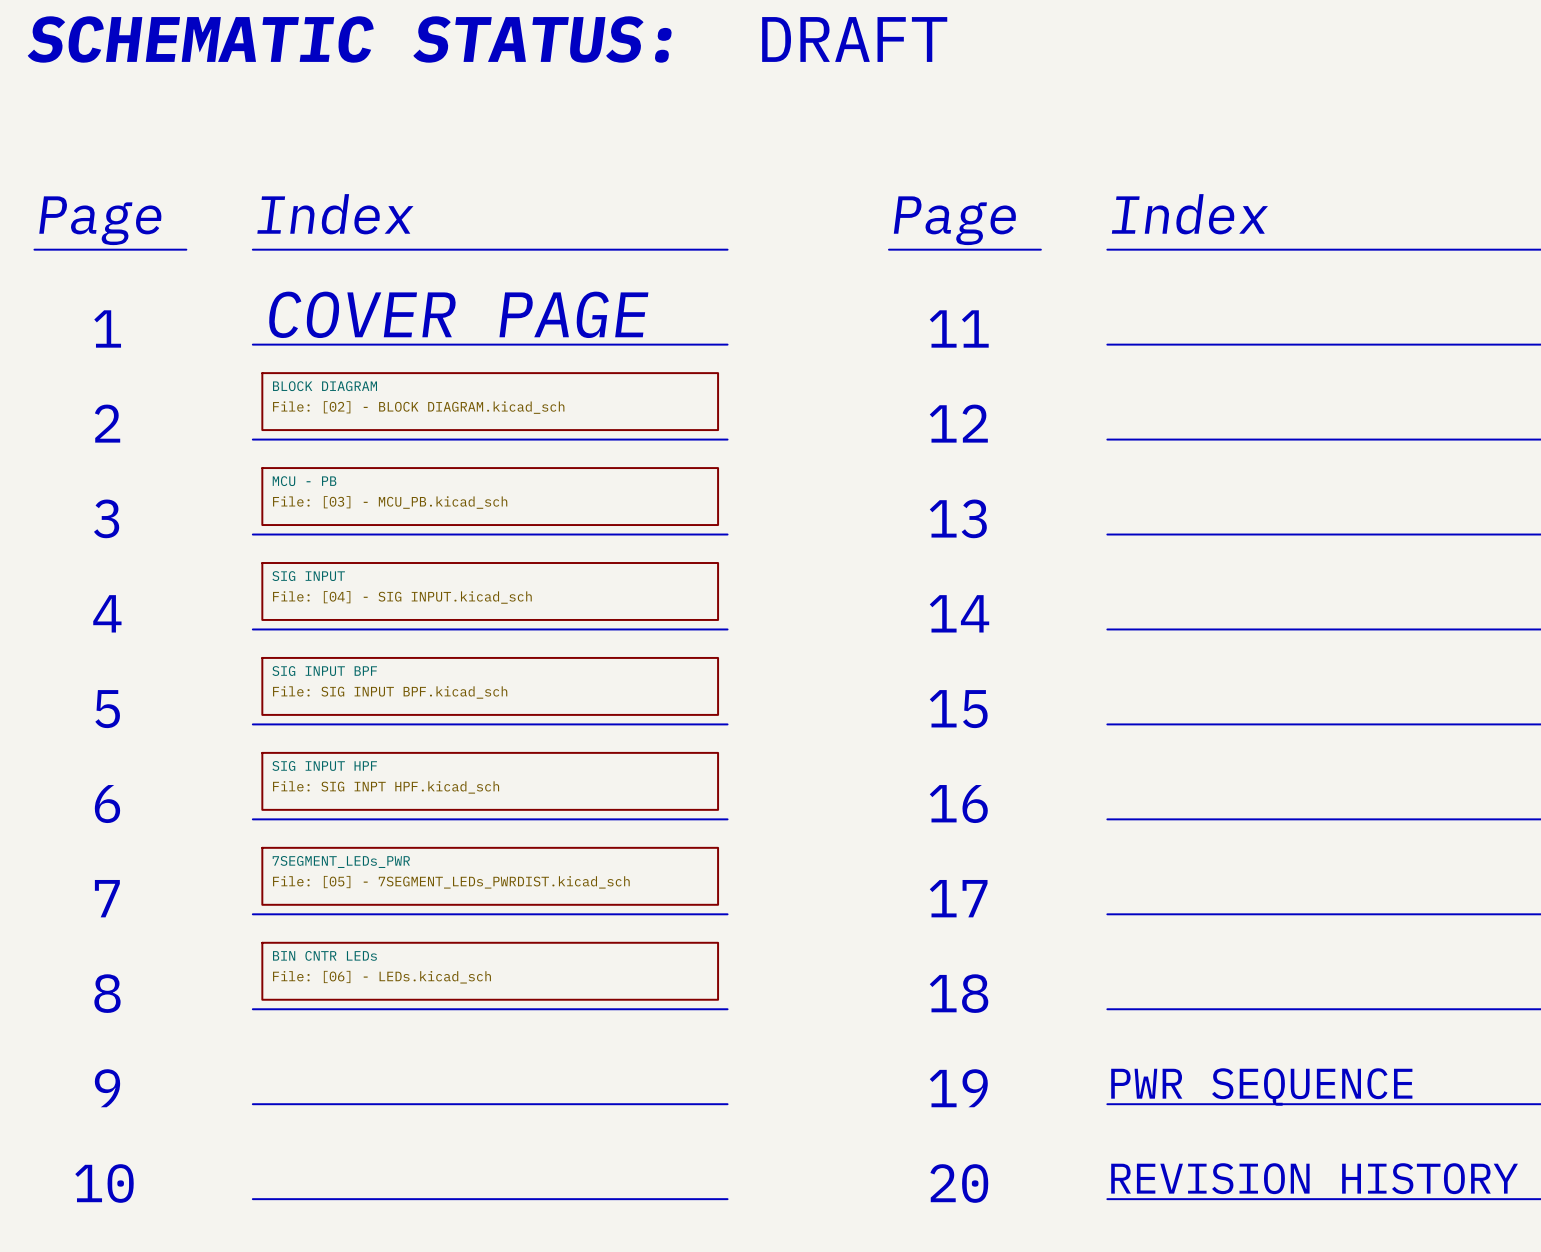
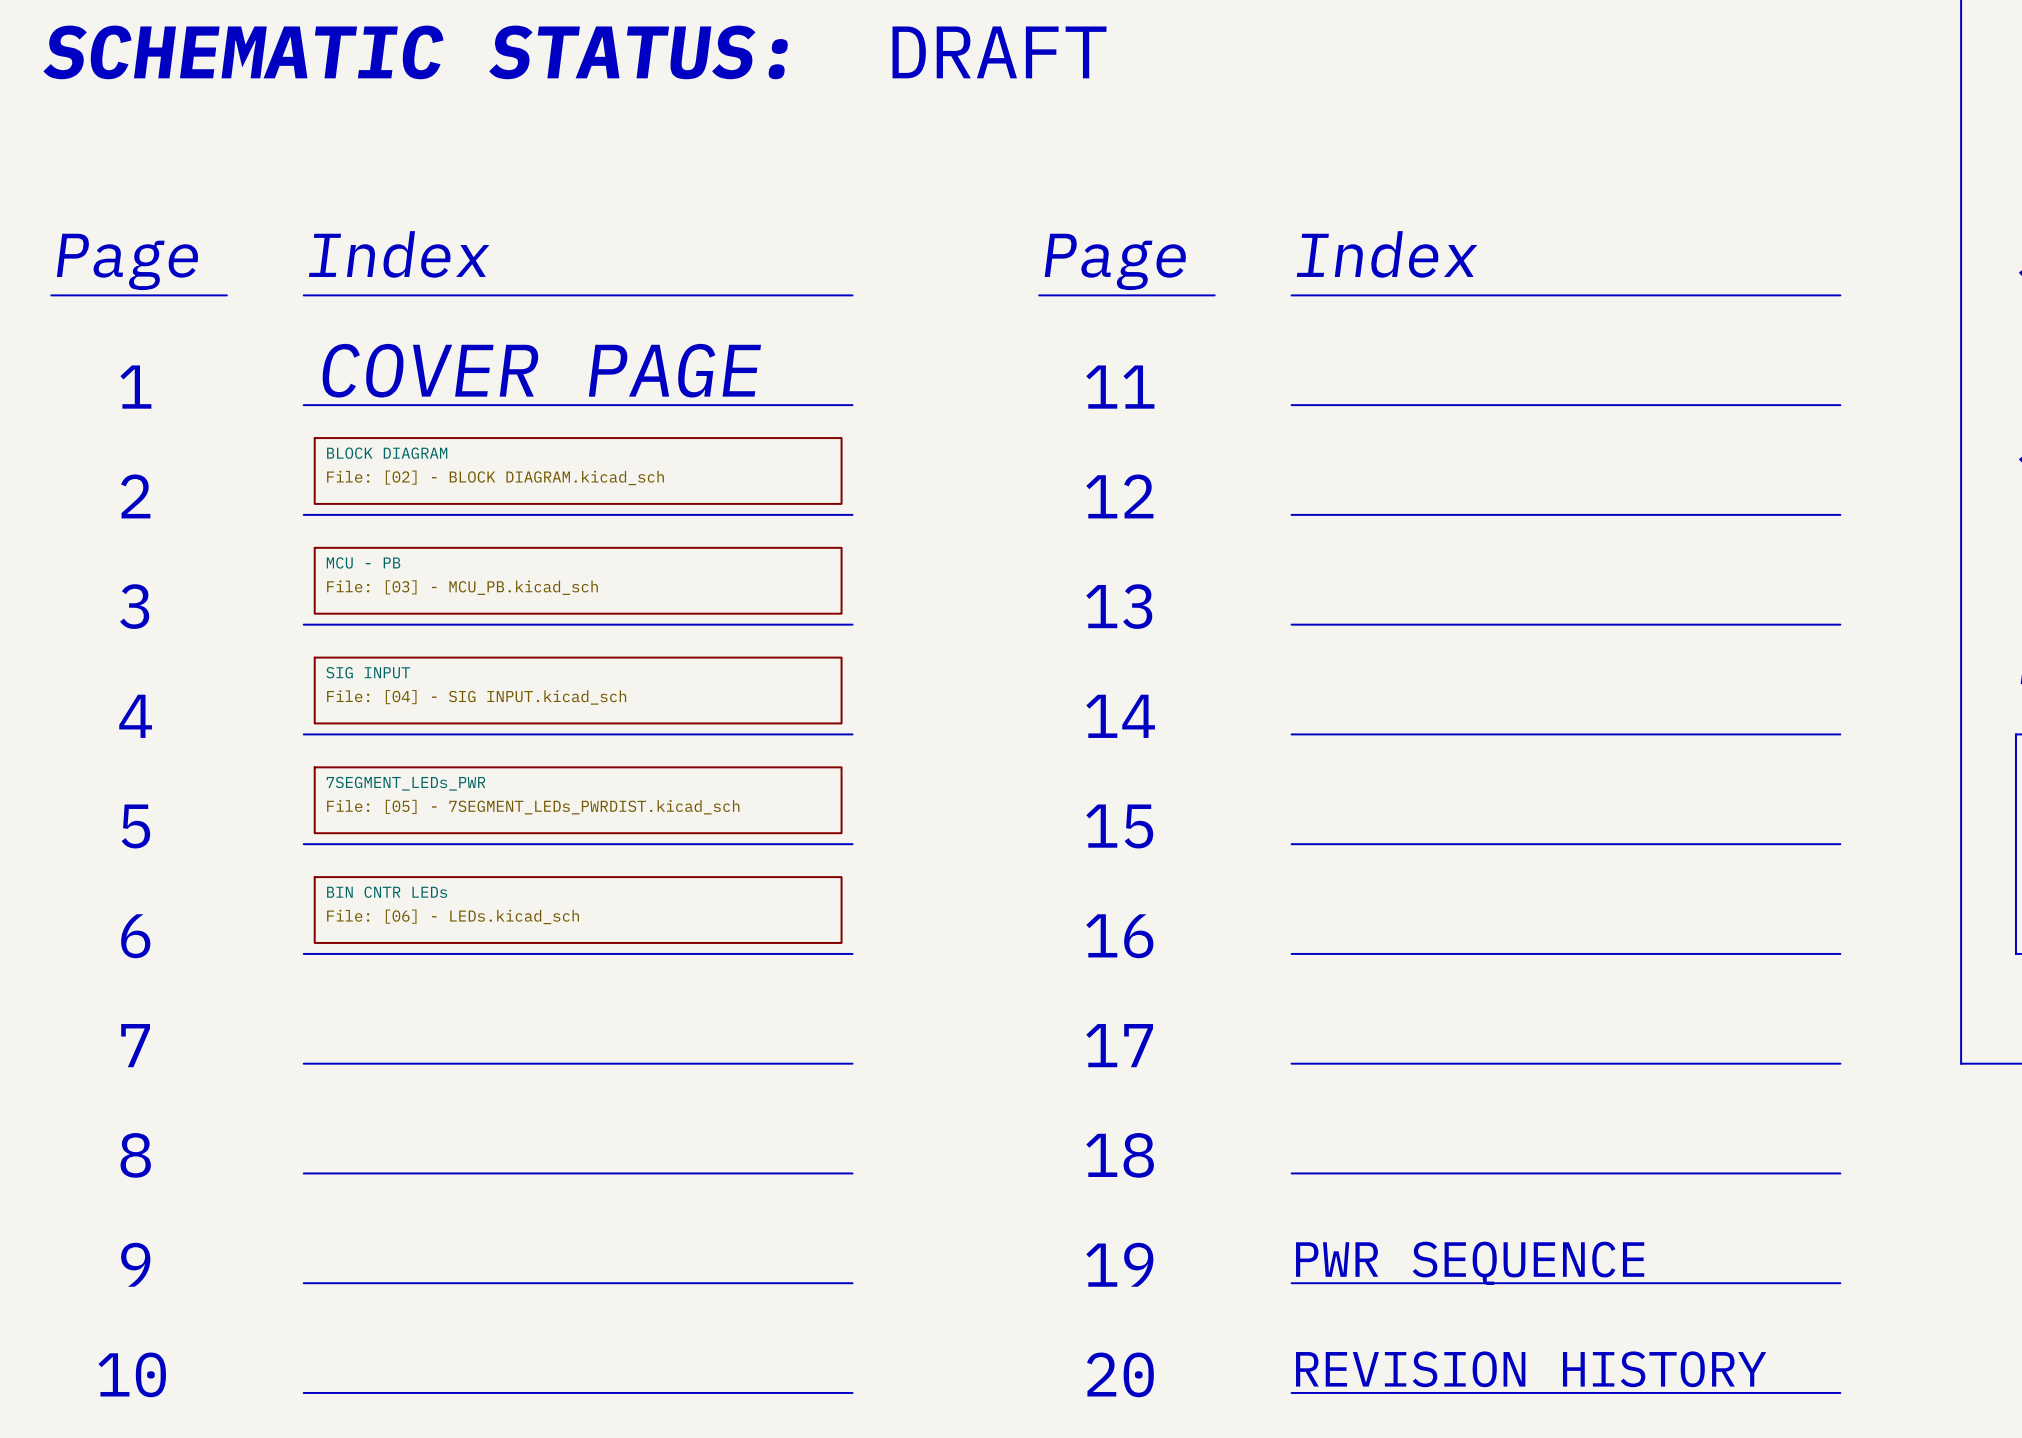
sheet SIG INPUT BPF name: SIG INPUT BPF (324, 671) -> 7SEGMENT_LEDs_PWR (406, 783)
sheet SIG INPUT BPF value: File: SIG INPUT BPF.kicad_sch (390, 692) -> File: [05] - 7SEGMENT_LEDs_PWRDIST.kicad_sch (533, 807)
sheet SIG INPUT HPF name: SIG INPUT HPF (324, 765) -> BIN CNTR LEDs (387, 892)
sheet SIG INPUT HPF value: File: SIG INPT HPF.kicad_sch (386, 787) -> File: [06] - LEDs.kicad_sch (453, 916)
sheet 7SEGMENT_LEDs_PWR: File: [05] - 7SEGMENT_LEDs_PWRDIST.kicad_sch (490, 876) -> none
sheet BIN CNTR LEDs: File: [06] - LEDs.kicad_sch (490, 971) -> none

